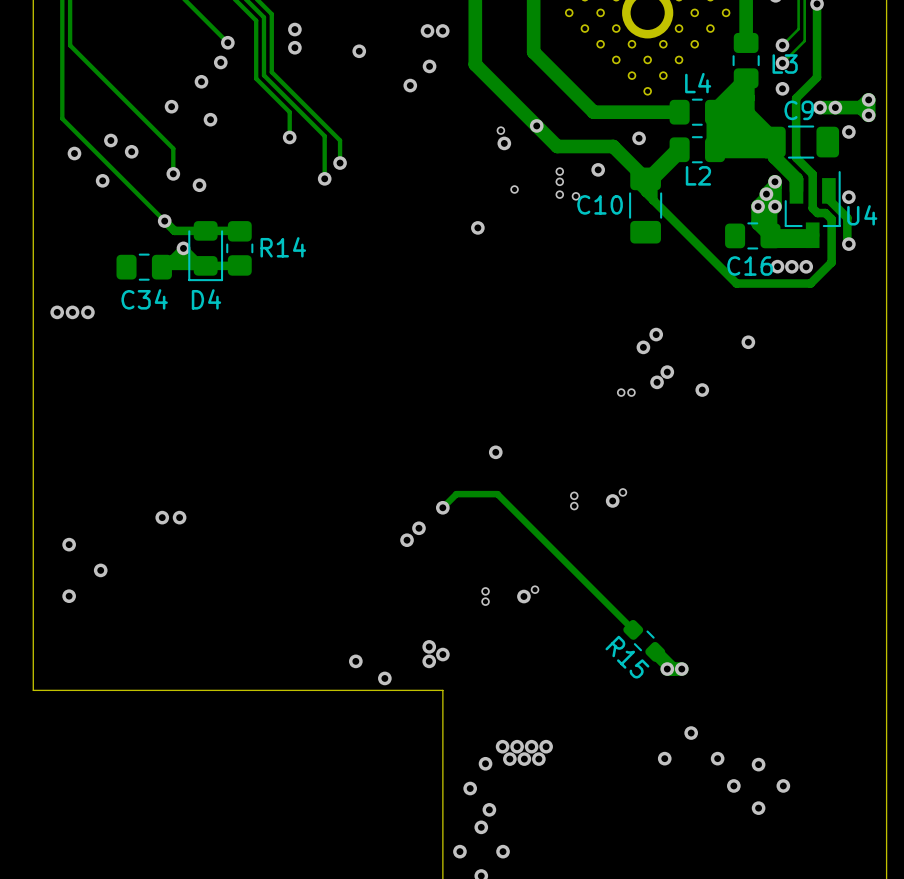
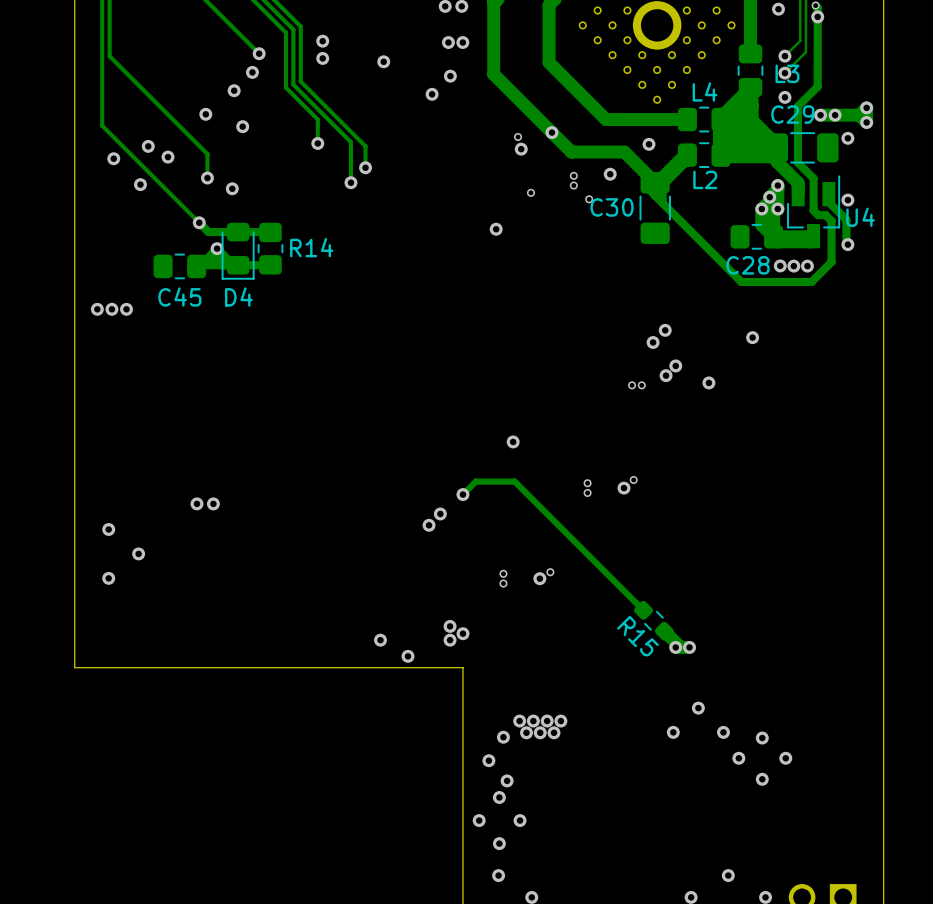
C9 name: C9 (799, 110) -> C29 (792, 114)
via: (559, 194) -> none
C10 name: C10 (600, 204) -> C30 (612, 207)
C16 name: C16 (750, 266) -> C28 (748, 265)
C34 name: C34 (144, 299) -> C45 (179, 297)

